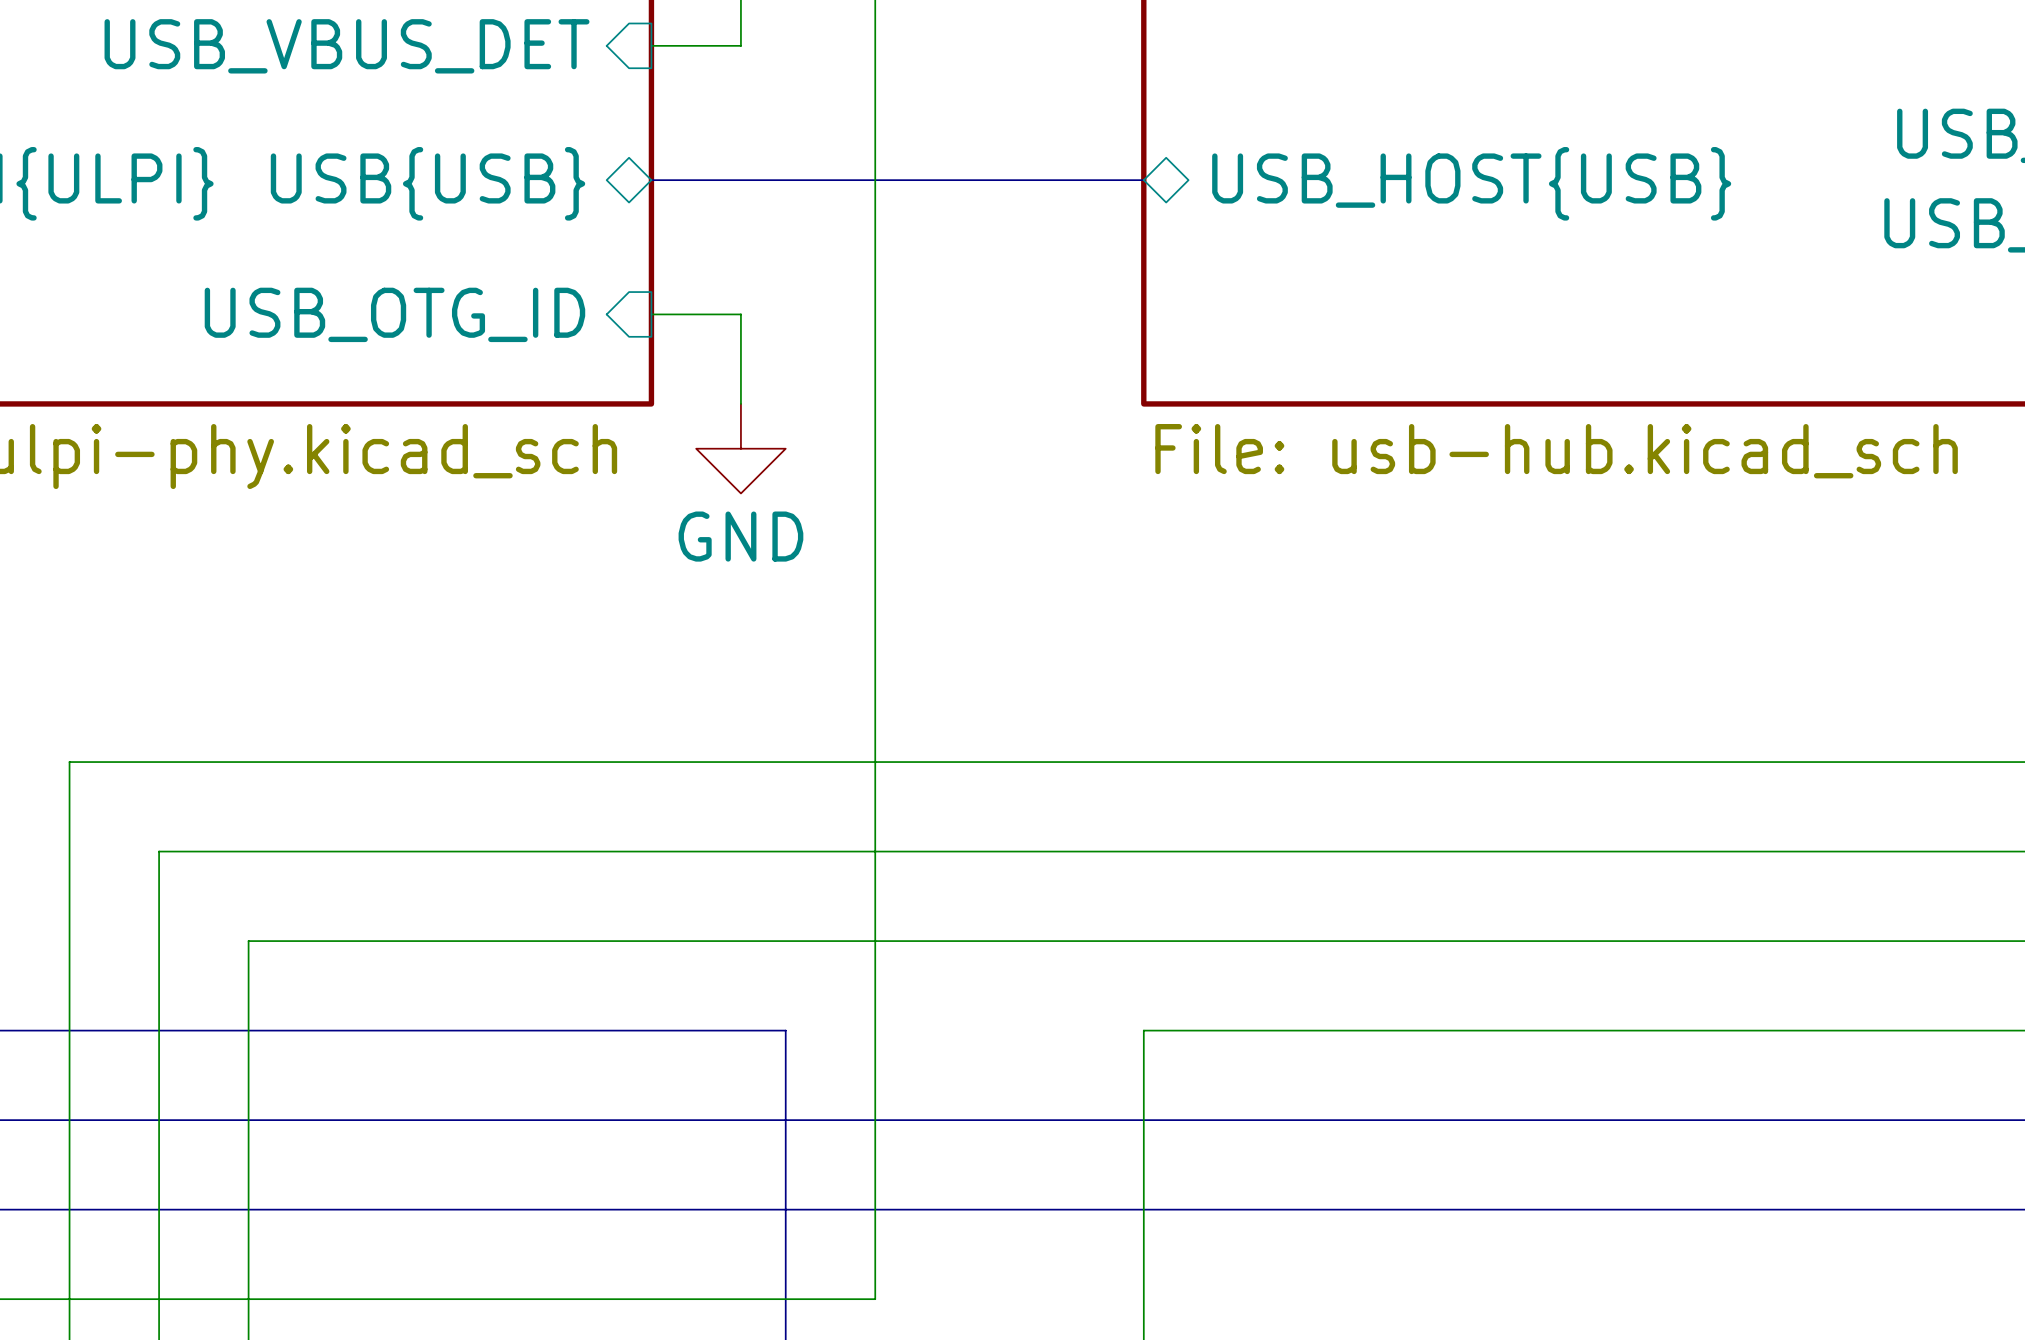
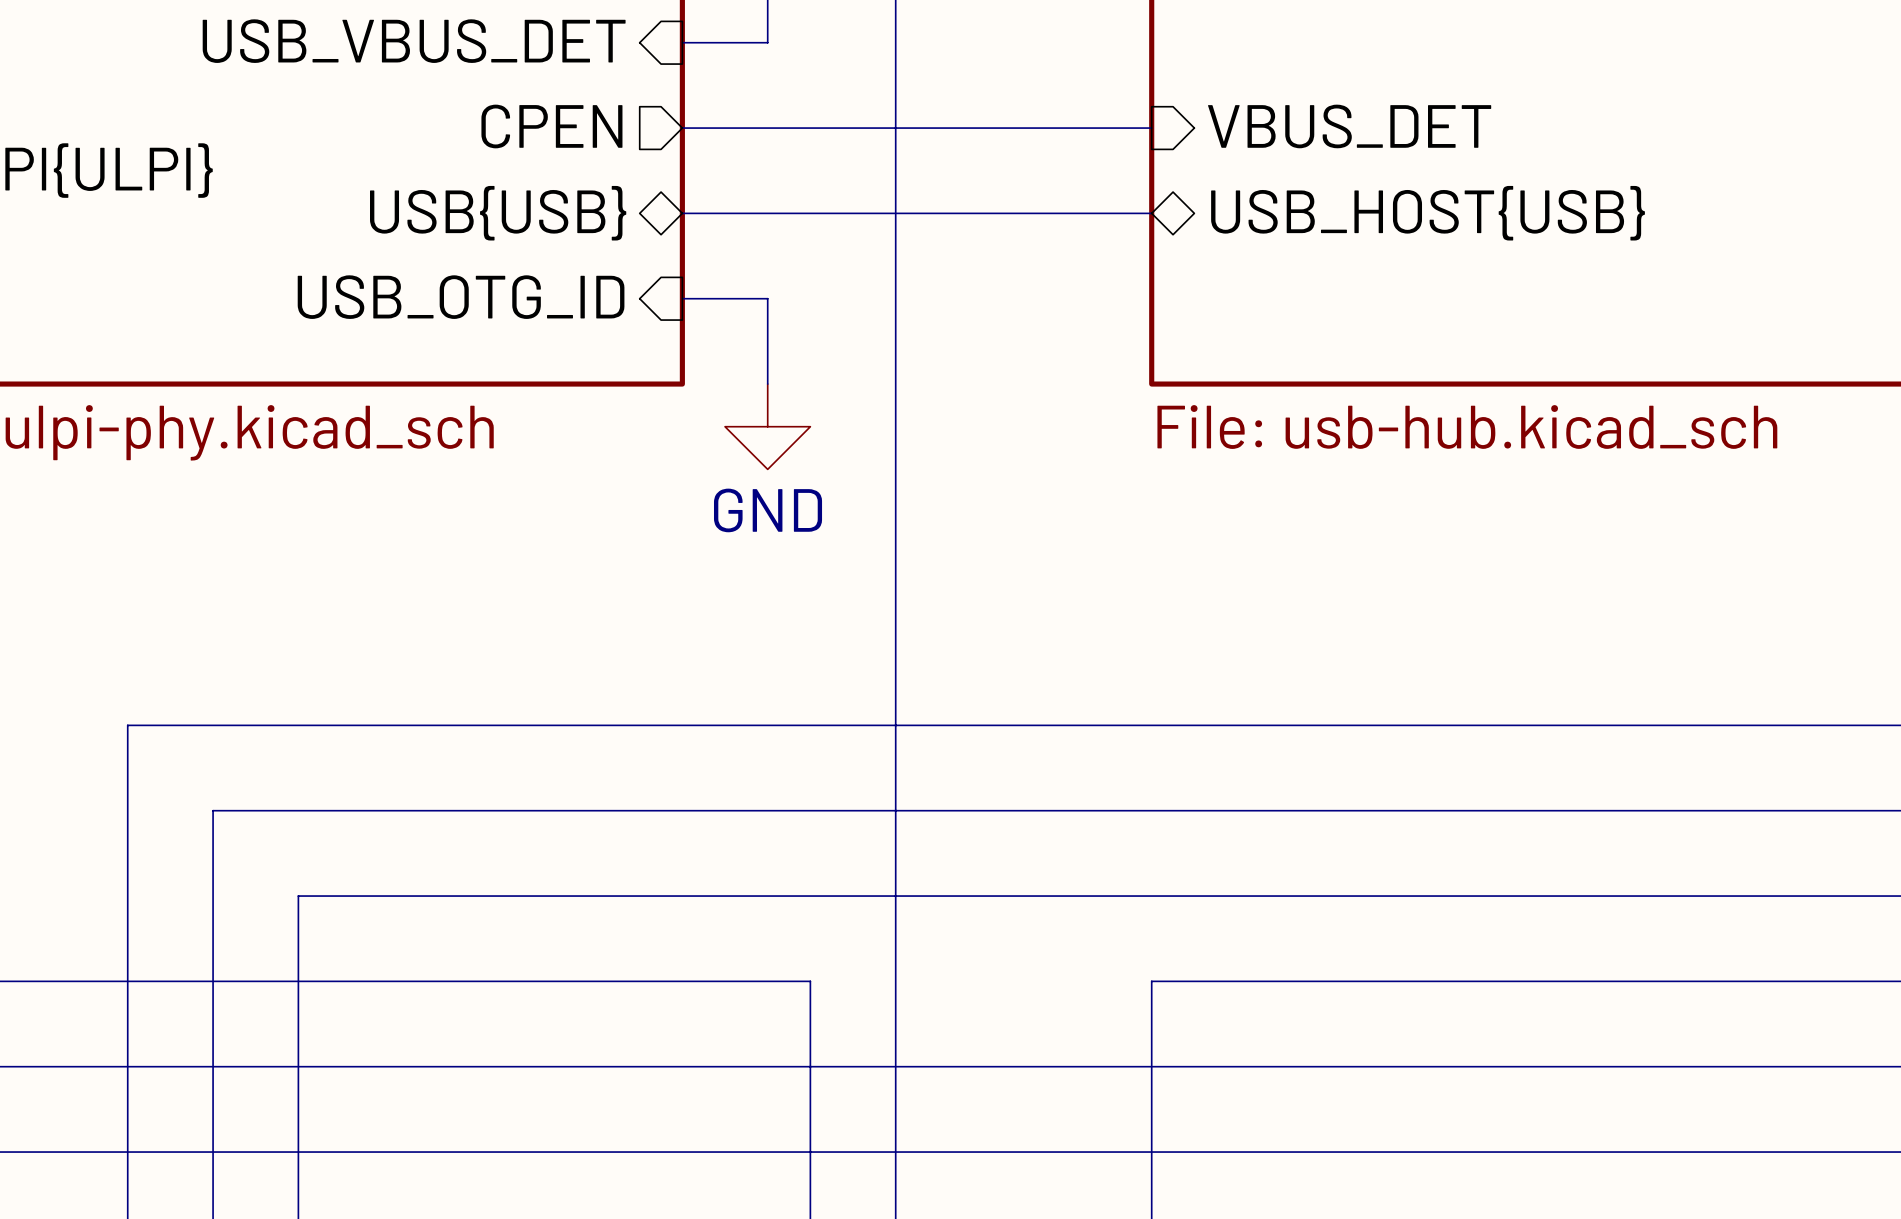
sheet pin: none -> CPEN (551, 126)
wire: none -> (682, 128) (1151, 128)
sheet pin: none -> VBUS_DET (1349, 126)
bus: (651, 180) (1143, 180) -> (682, 213) (1151, 213)
sheet pin position: USB{USB} (428, 183) -> USB{USB} (498, 213)
sheet pin position: USB_HOST{USB} (1471, 183) -> USB_HOST{USB} (1428, 213)

